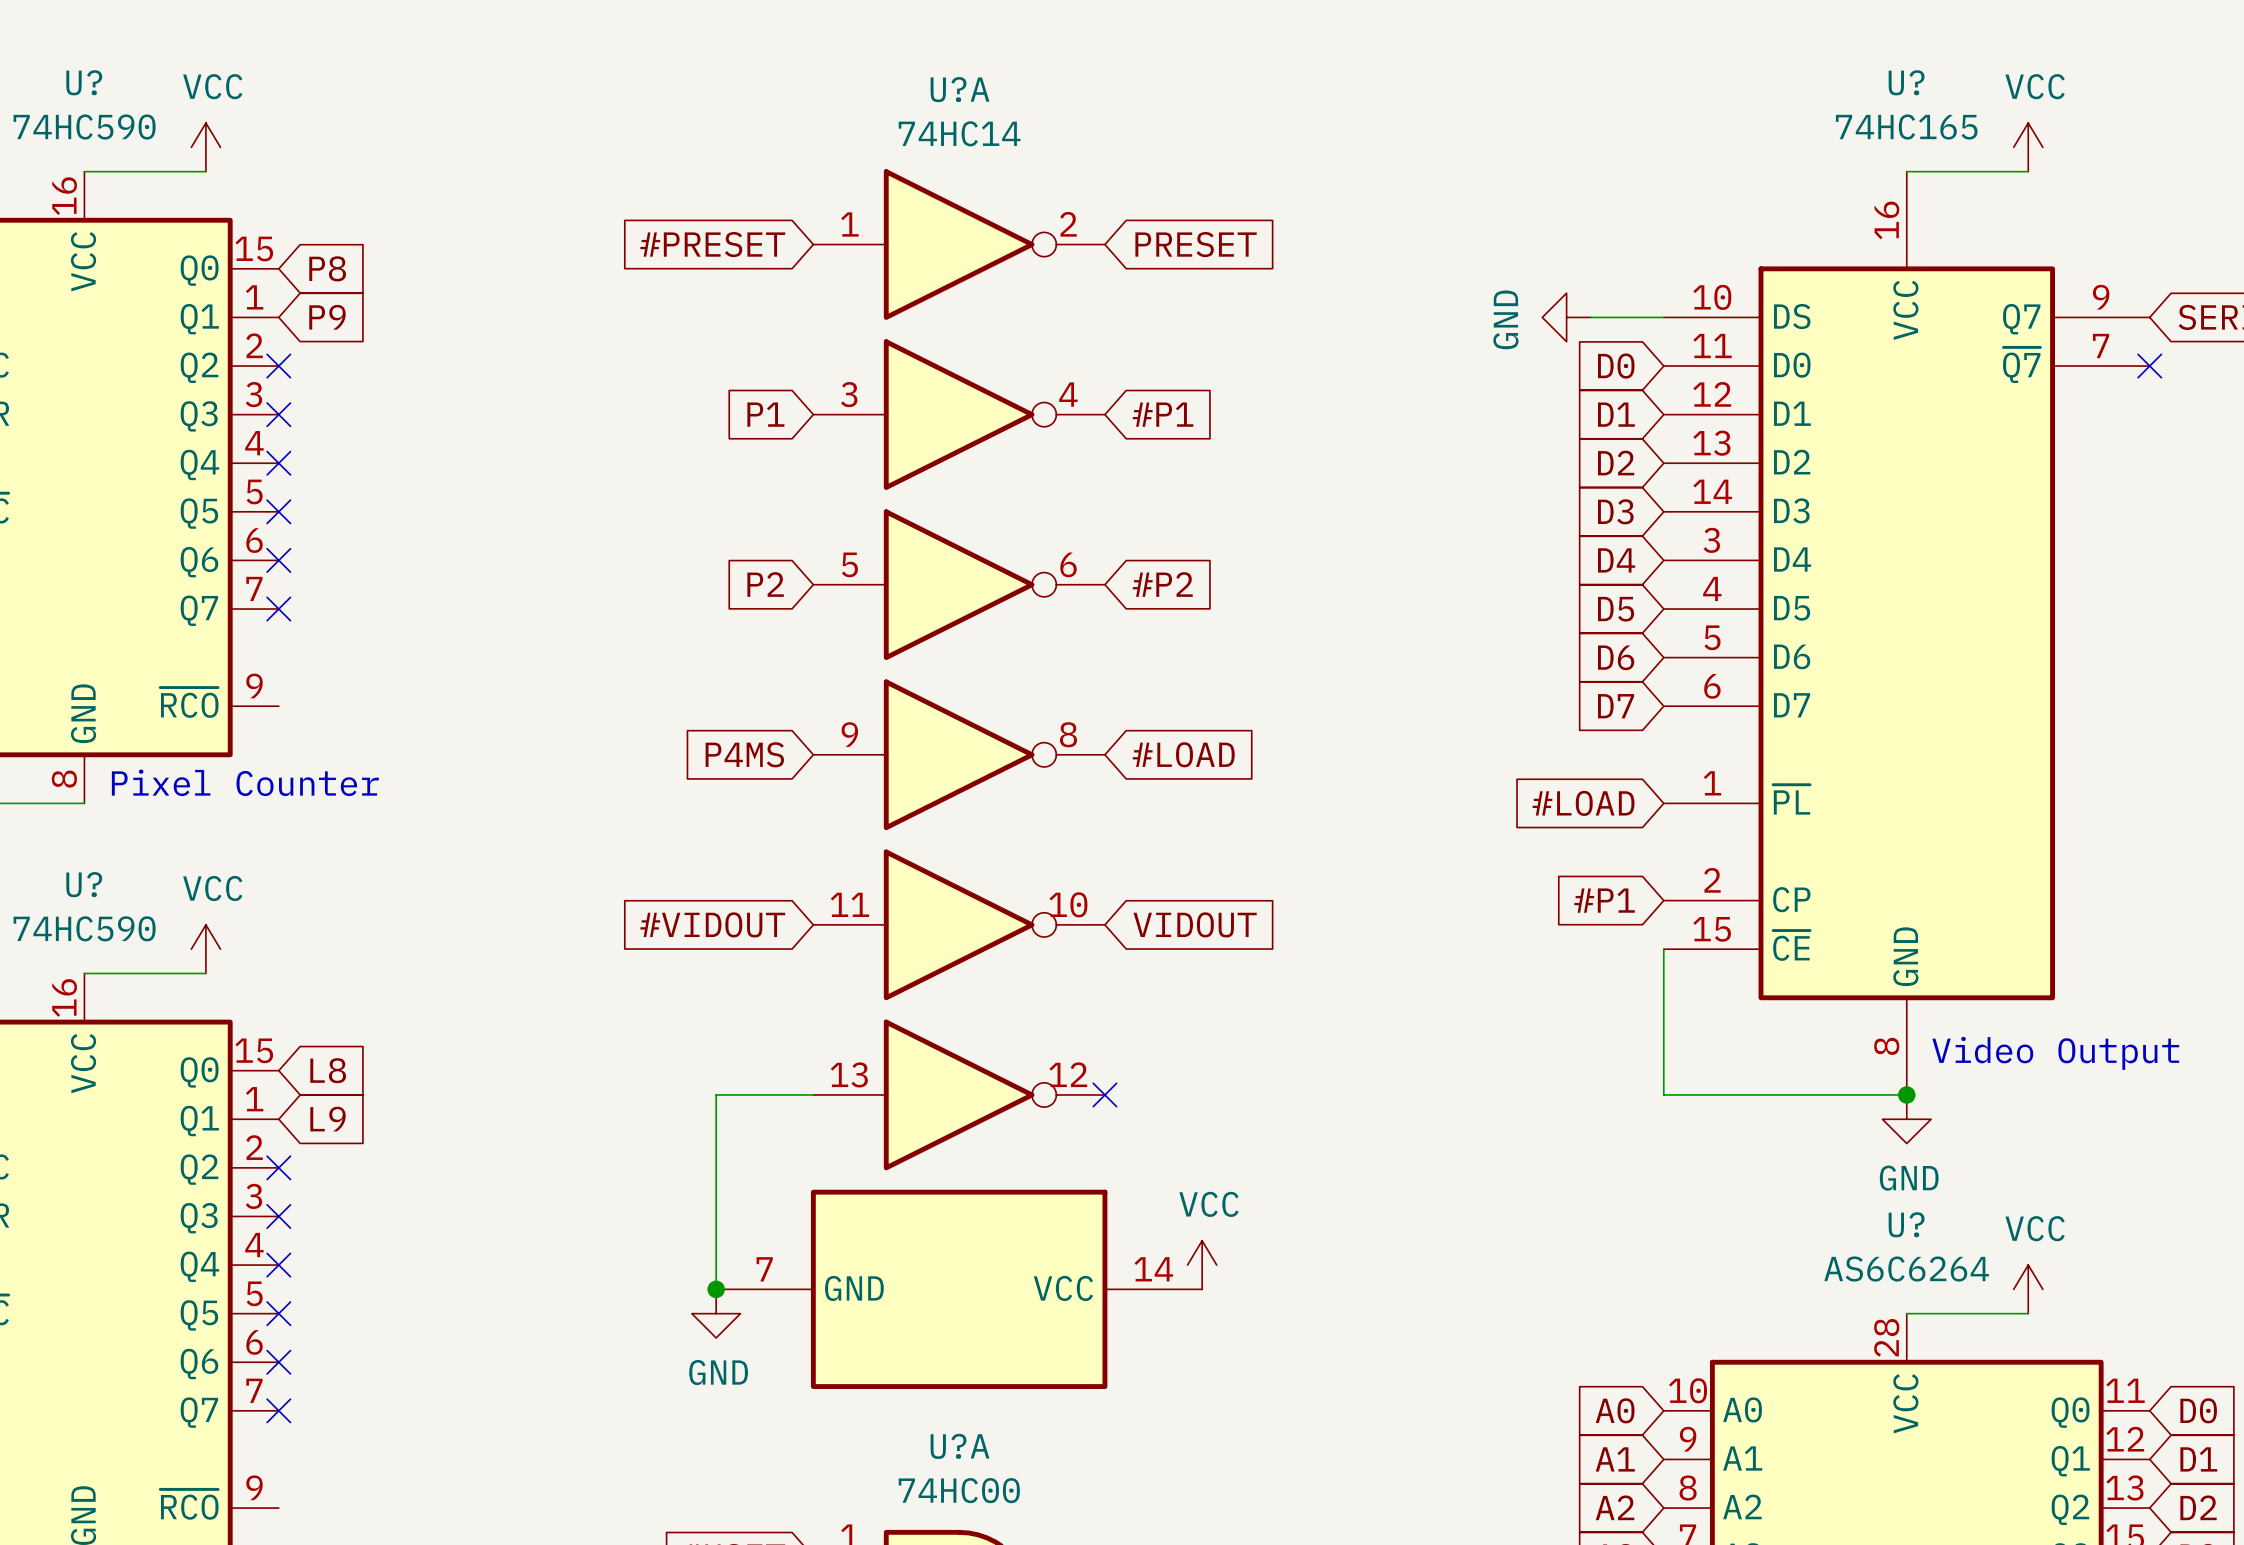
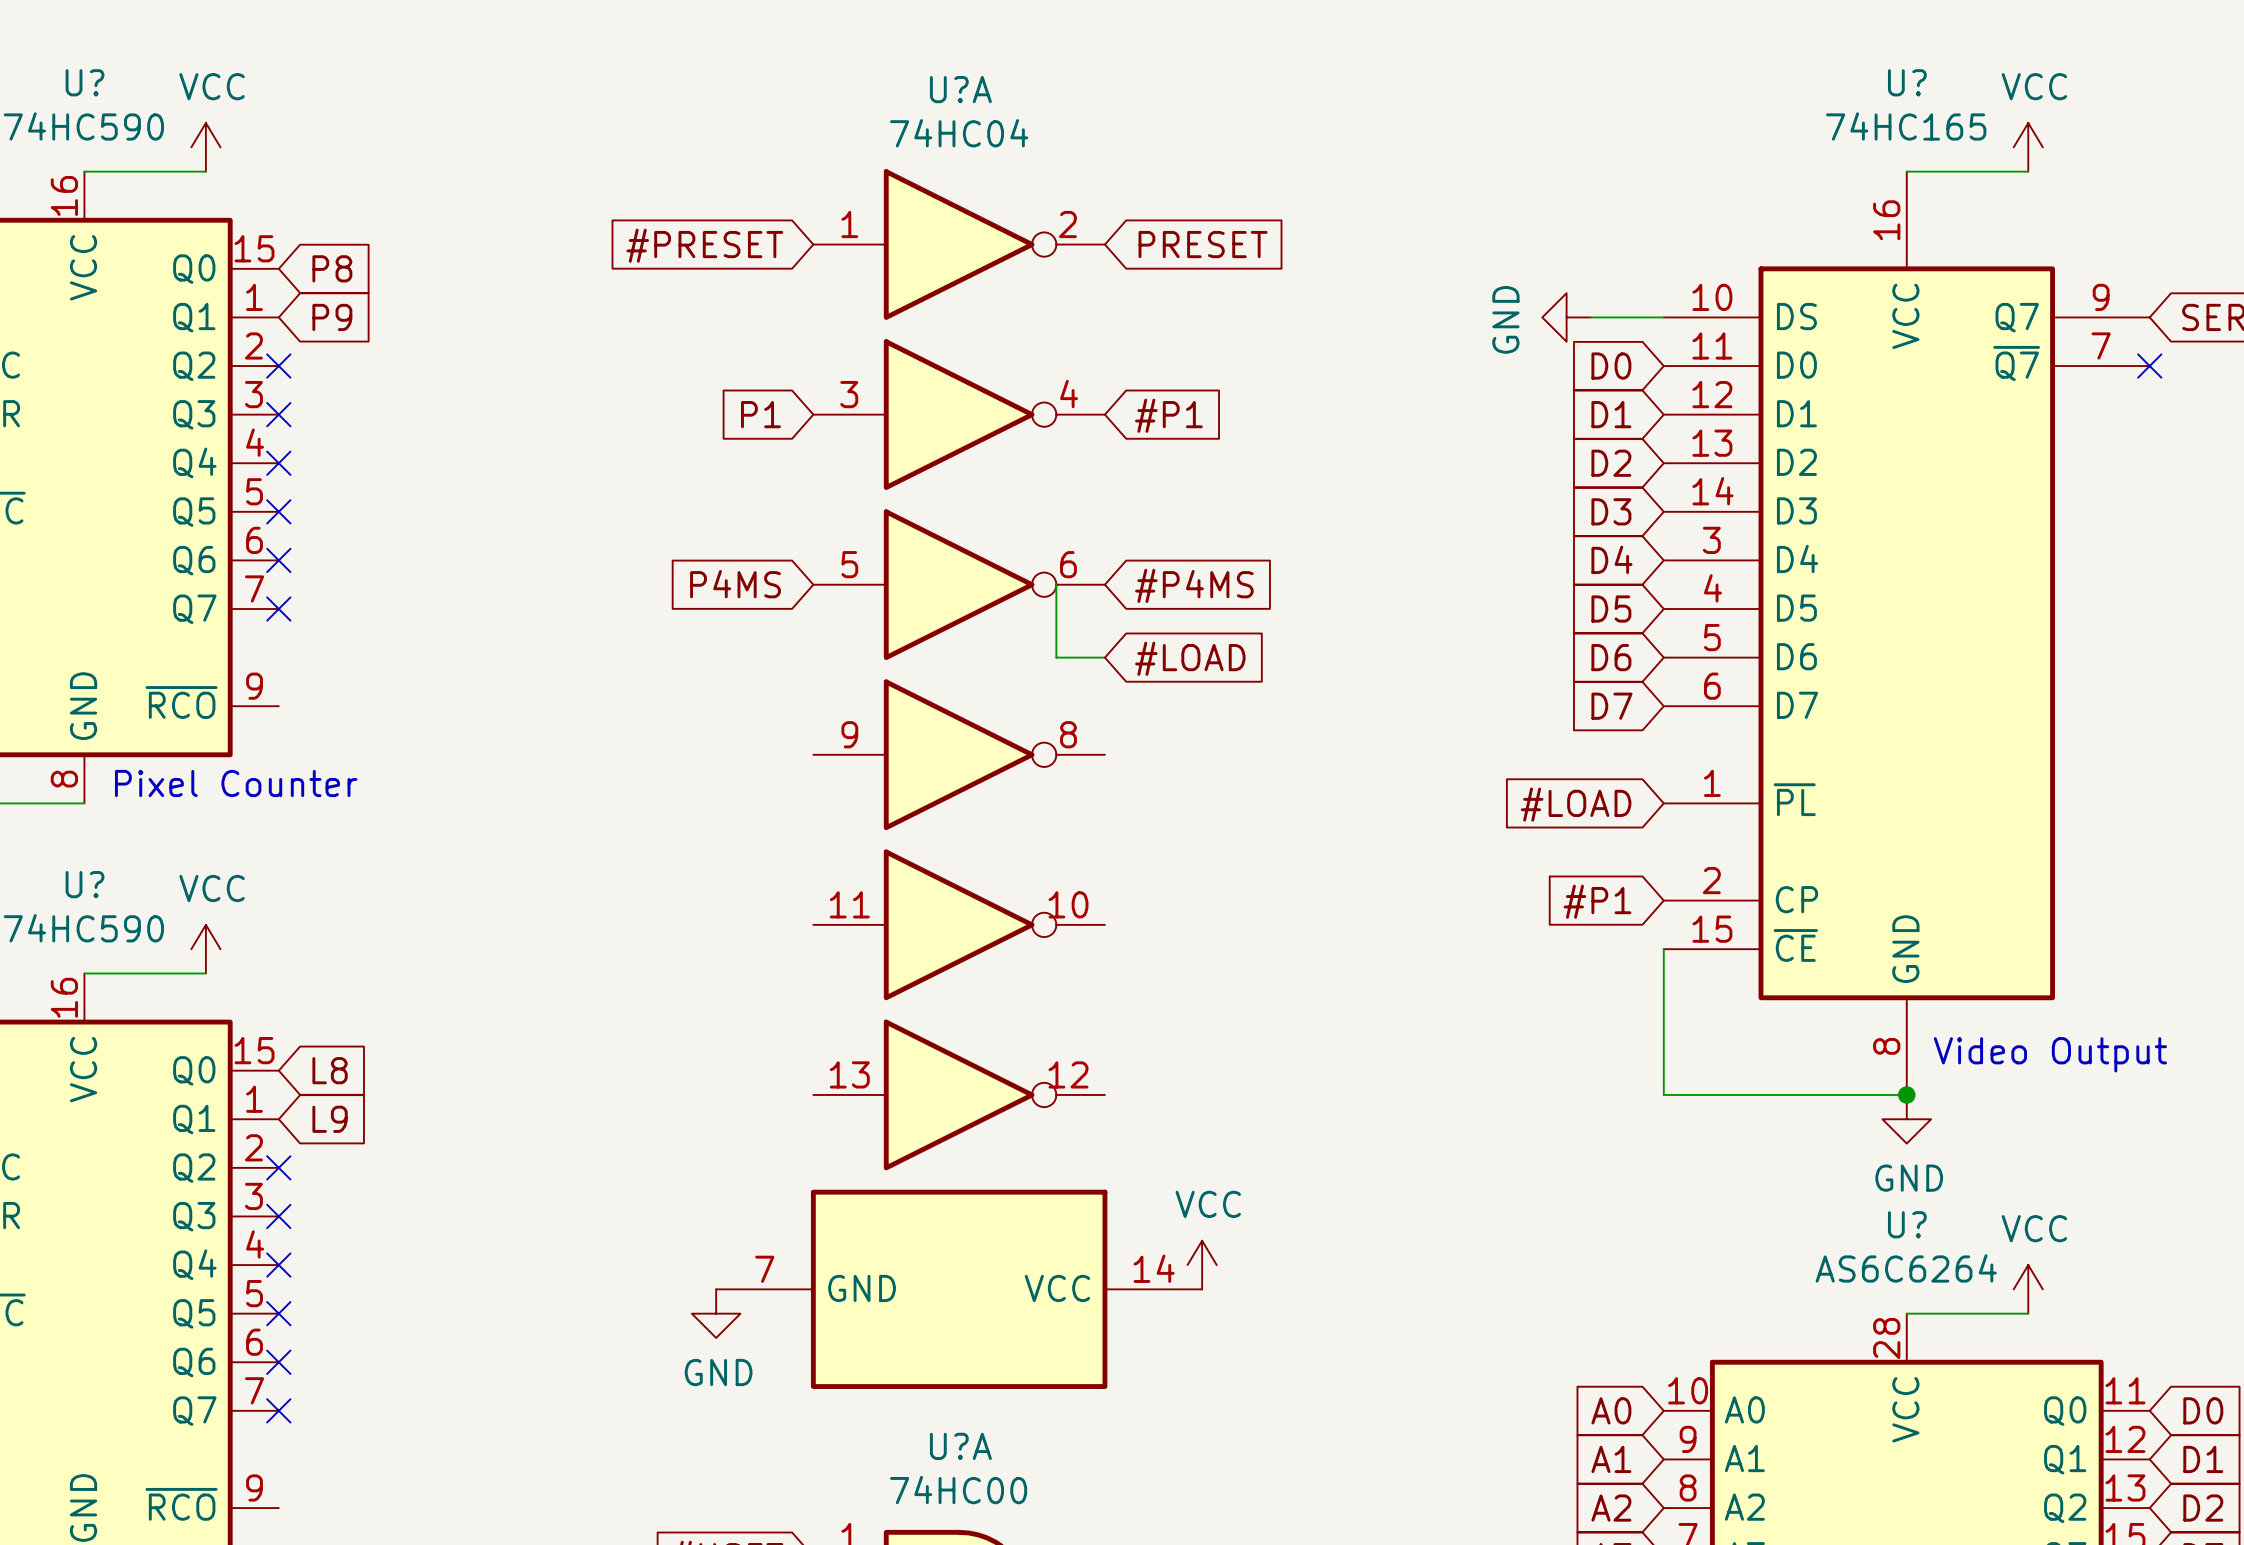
U?A value: 74HC14 (959, 133) -> 74HC04 (959, 133)
global label: P2 (765, 584) -> P4MS (735, 584)
wire: none -> (1056, 584) (1056, 657) (1104, 657)
global label: #P2 (1162, 584) -> #P4MS (1194, 585)
global label: P4MS (744, 754) -> none
global label position: #LOAD (1183, 754) -> #LOAD (1190, 658)
global label: #VIDOUT (712, 924) -> none
global label: VIDOUT (1195, 924) -> none
wire: (813, 1094) (716, 1094) (716, 1289) -> none
no-connect mark: (1104, 1094) -> none
junction: (716, 1289) -> none

